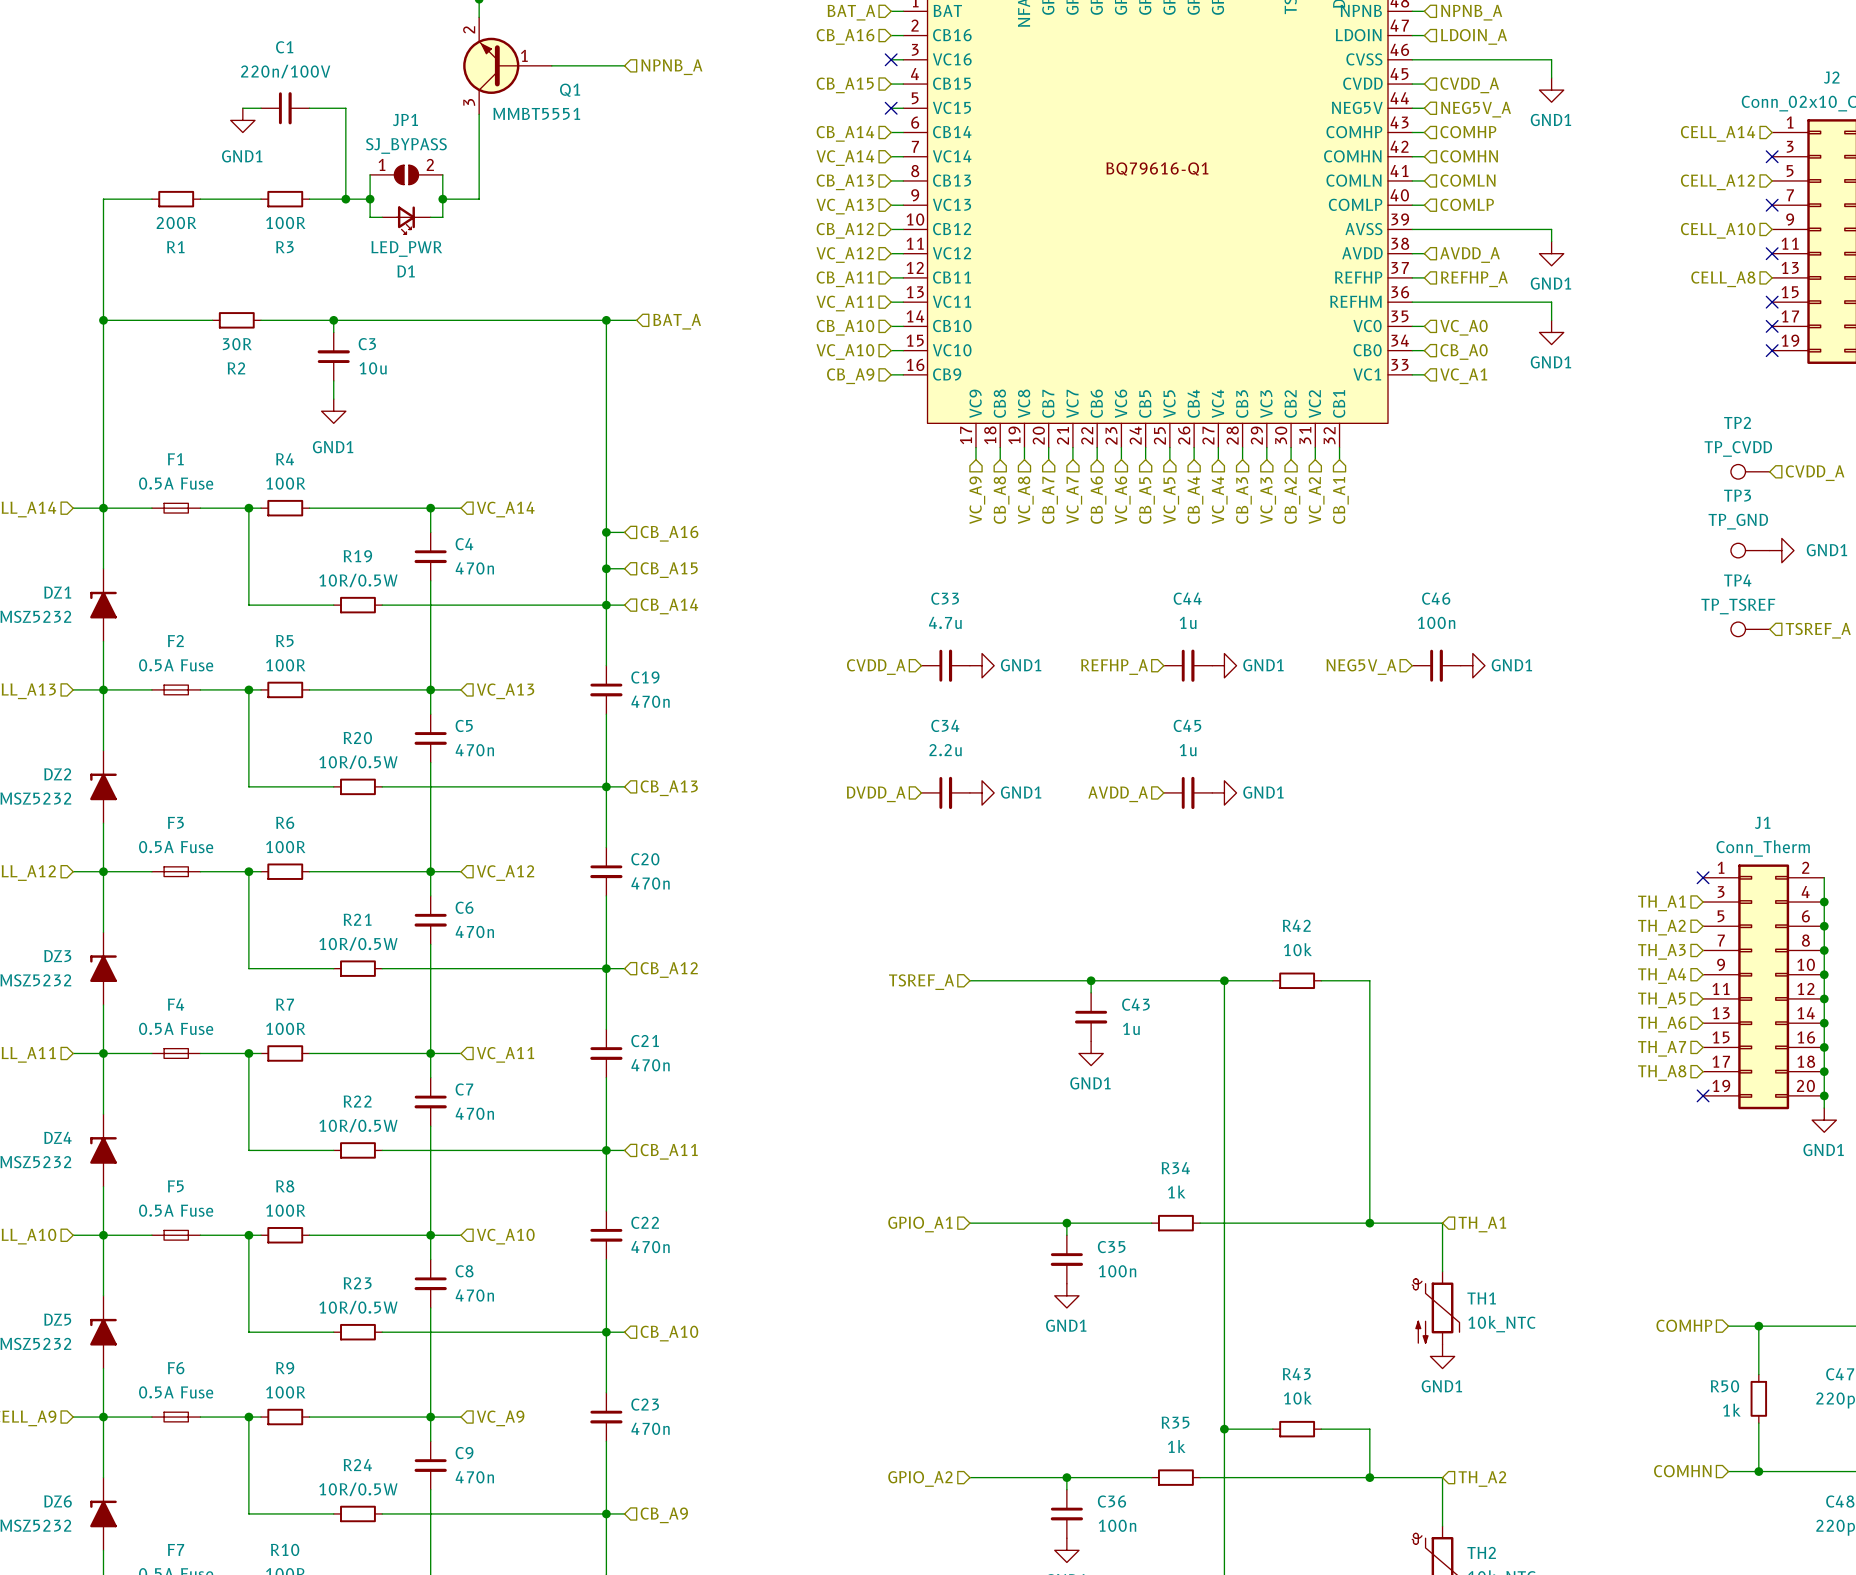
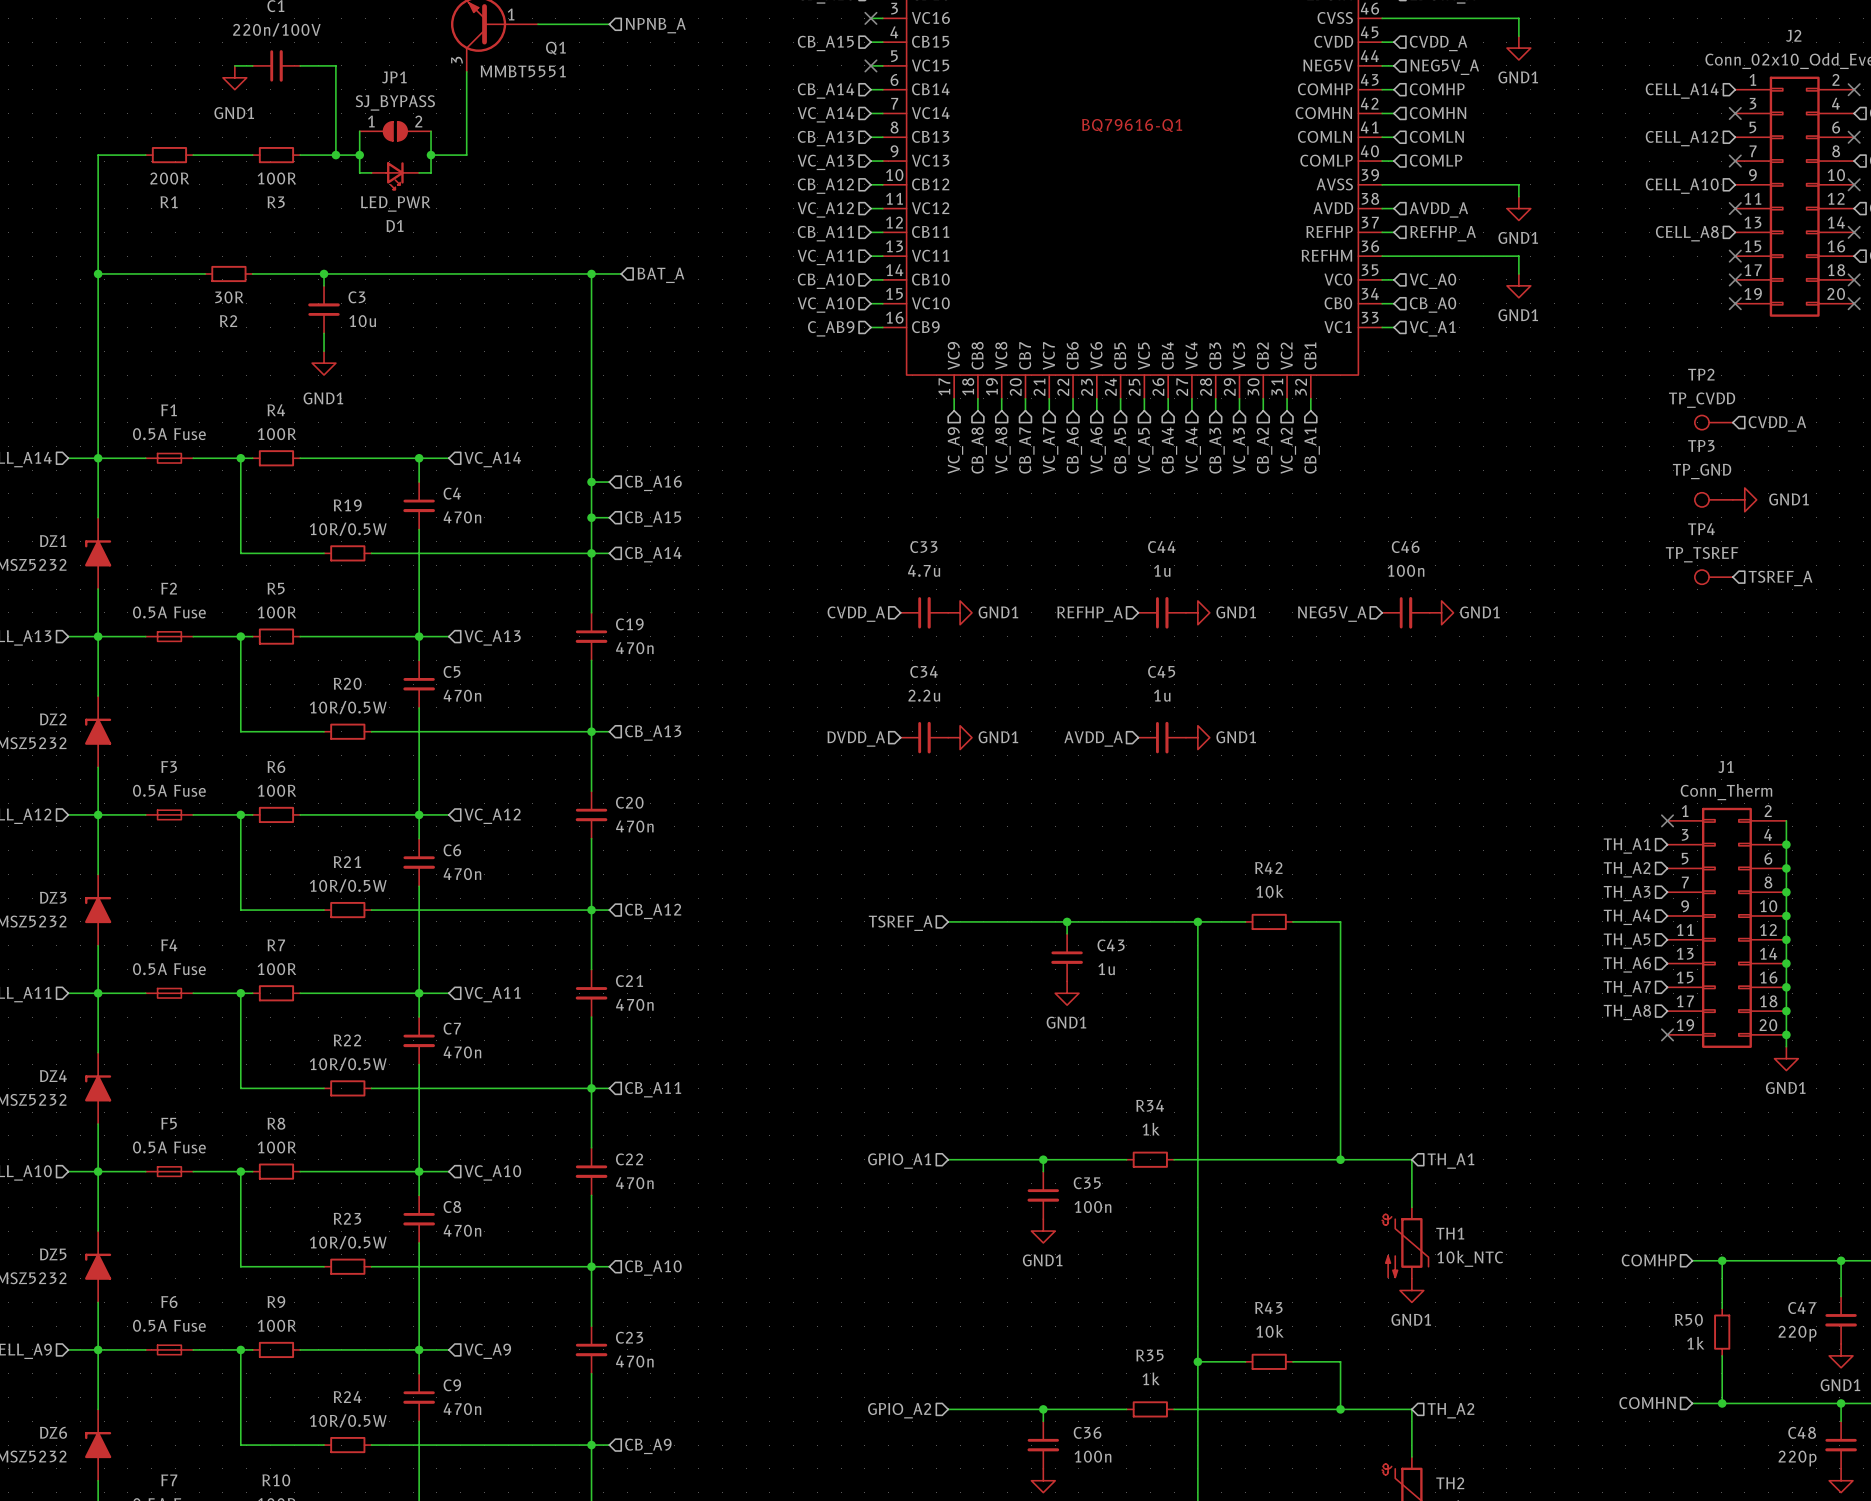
hierarchical label: CB_A9 (850, 376) -> C_AB9 (831, 328)

